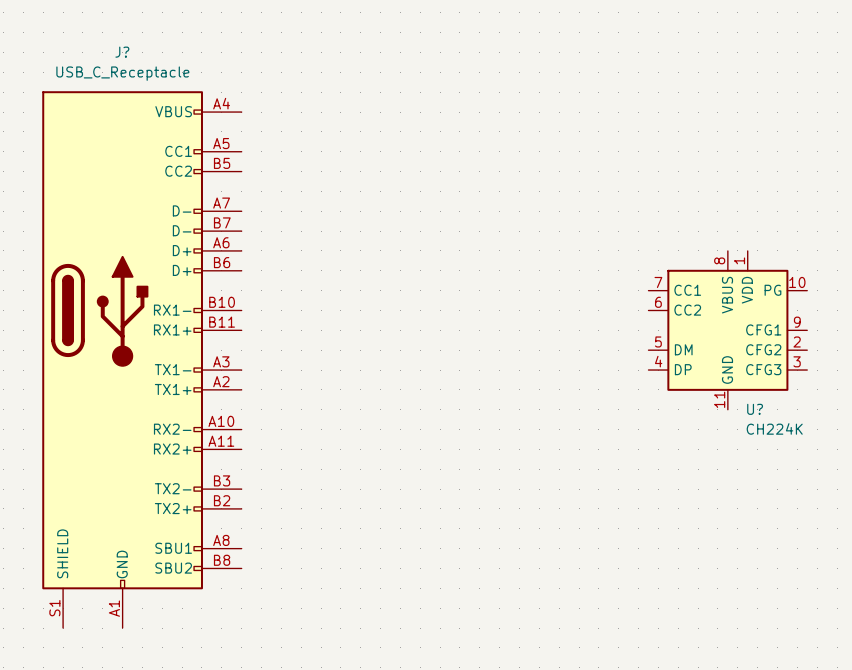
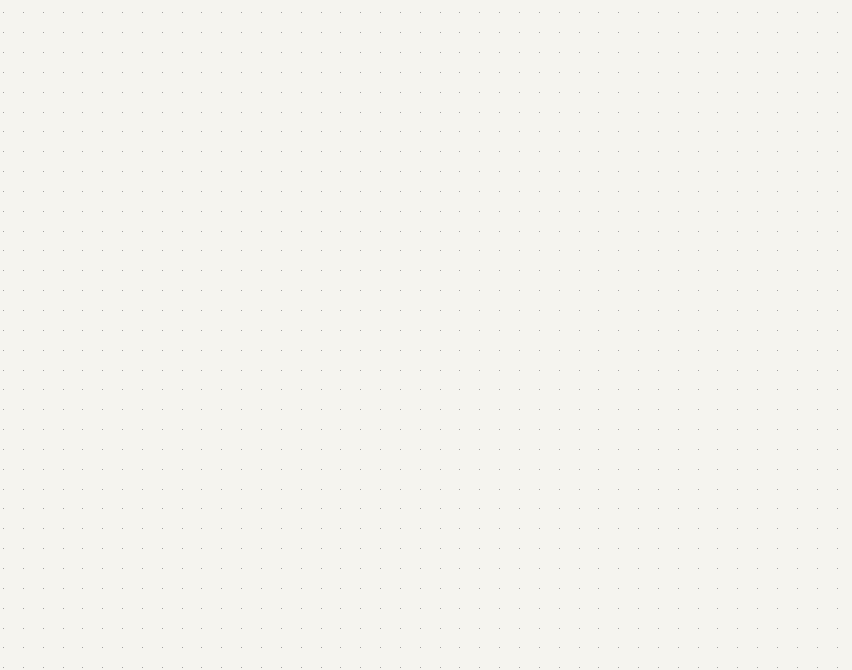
U?: CH224K (727, 330) -> none
J?: USB_C_Receptacle (141, 359) -> none

